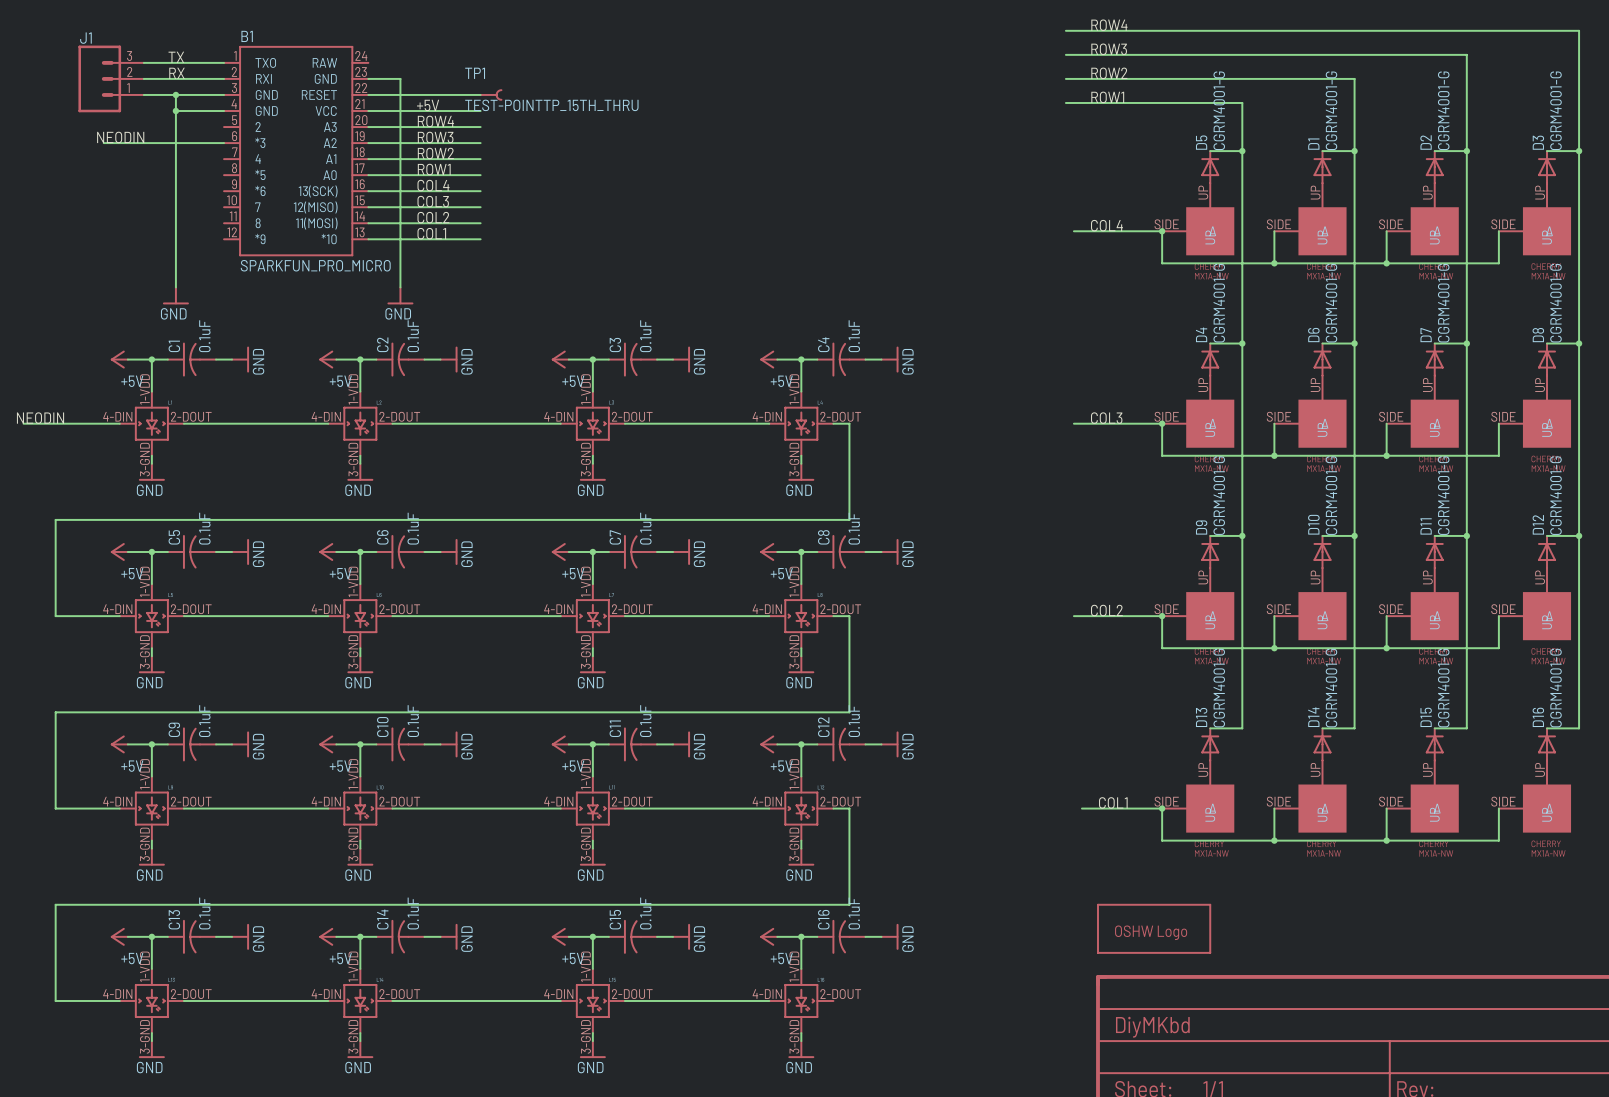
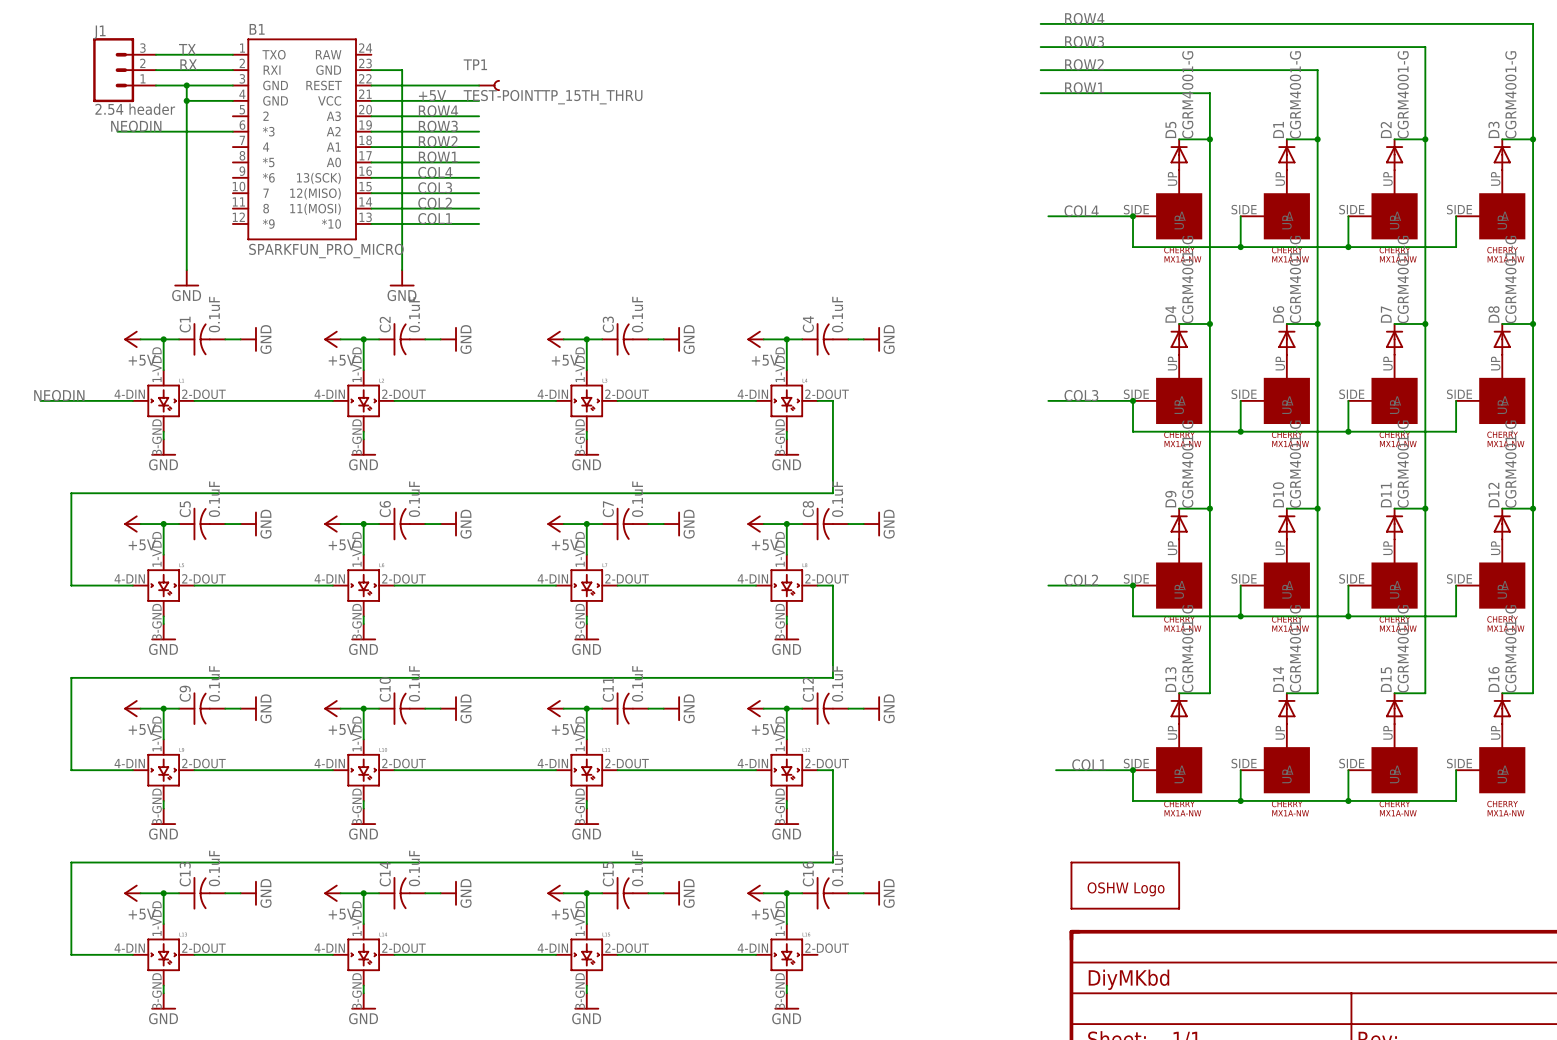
J1 value: none -> 2.54 header (135, 109)

